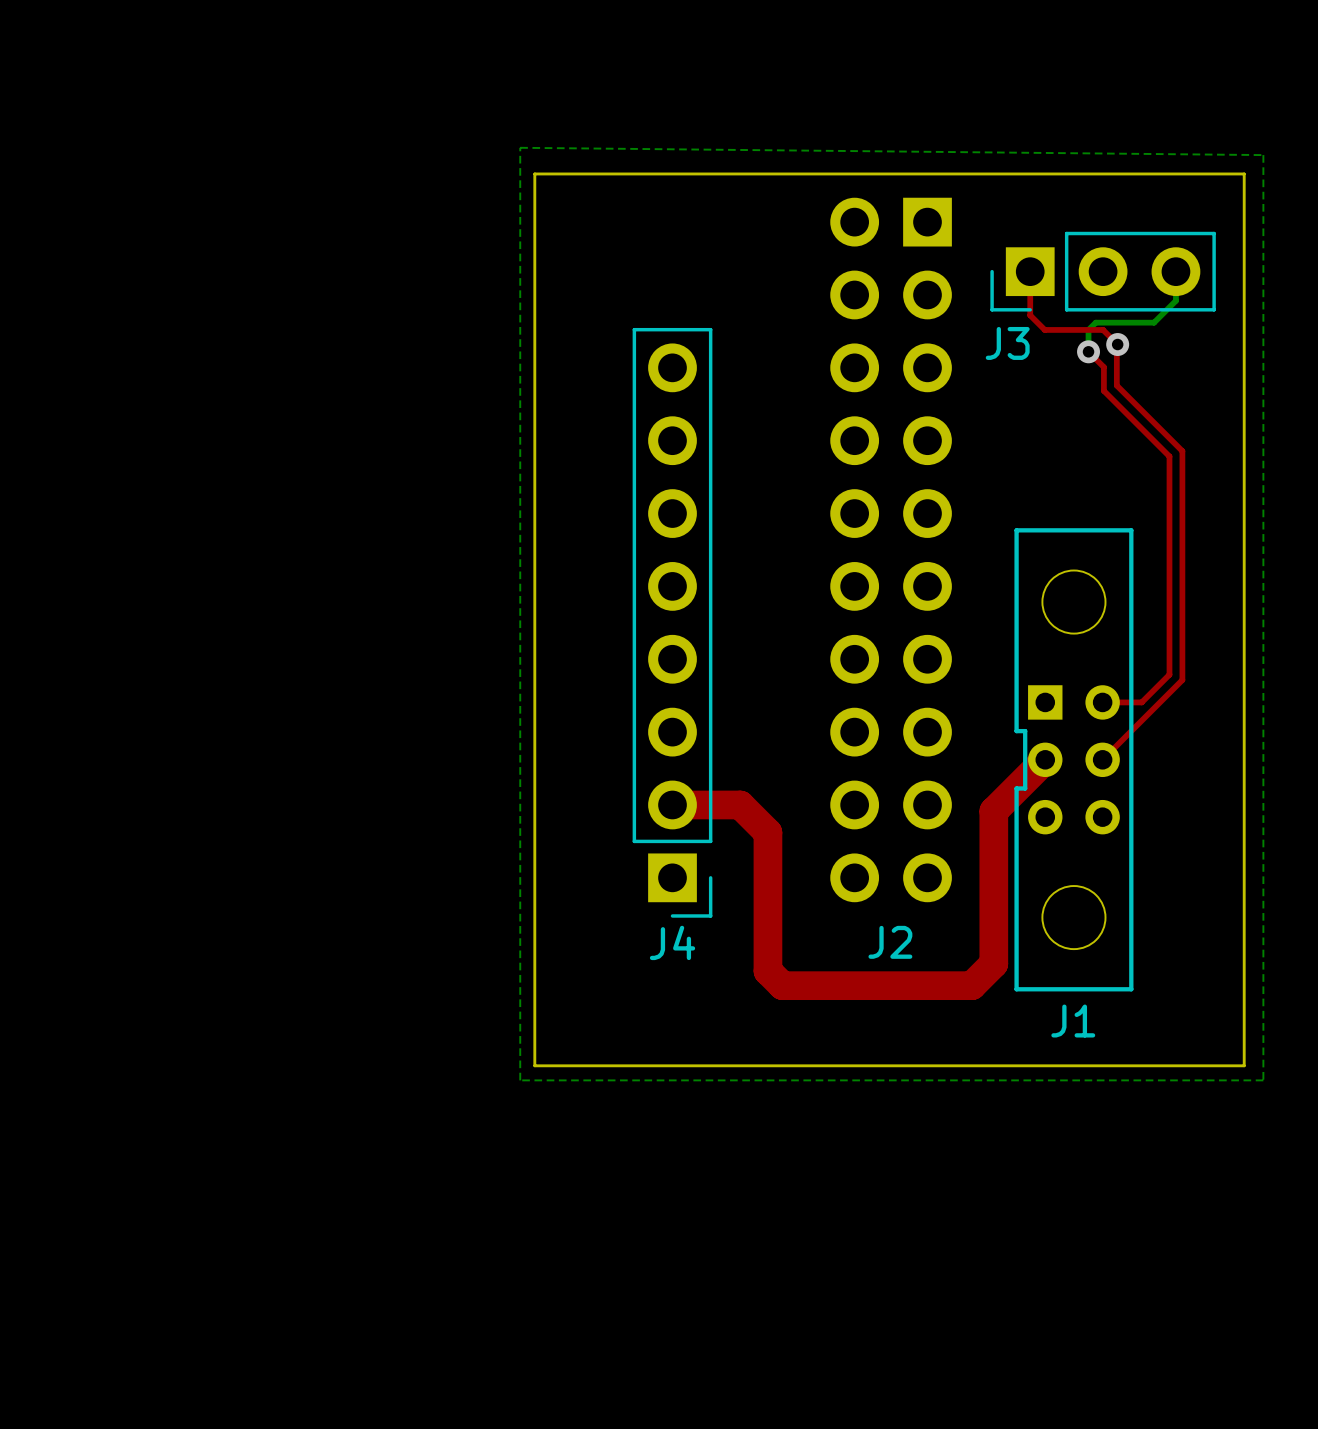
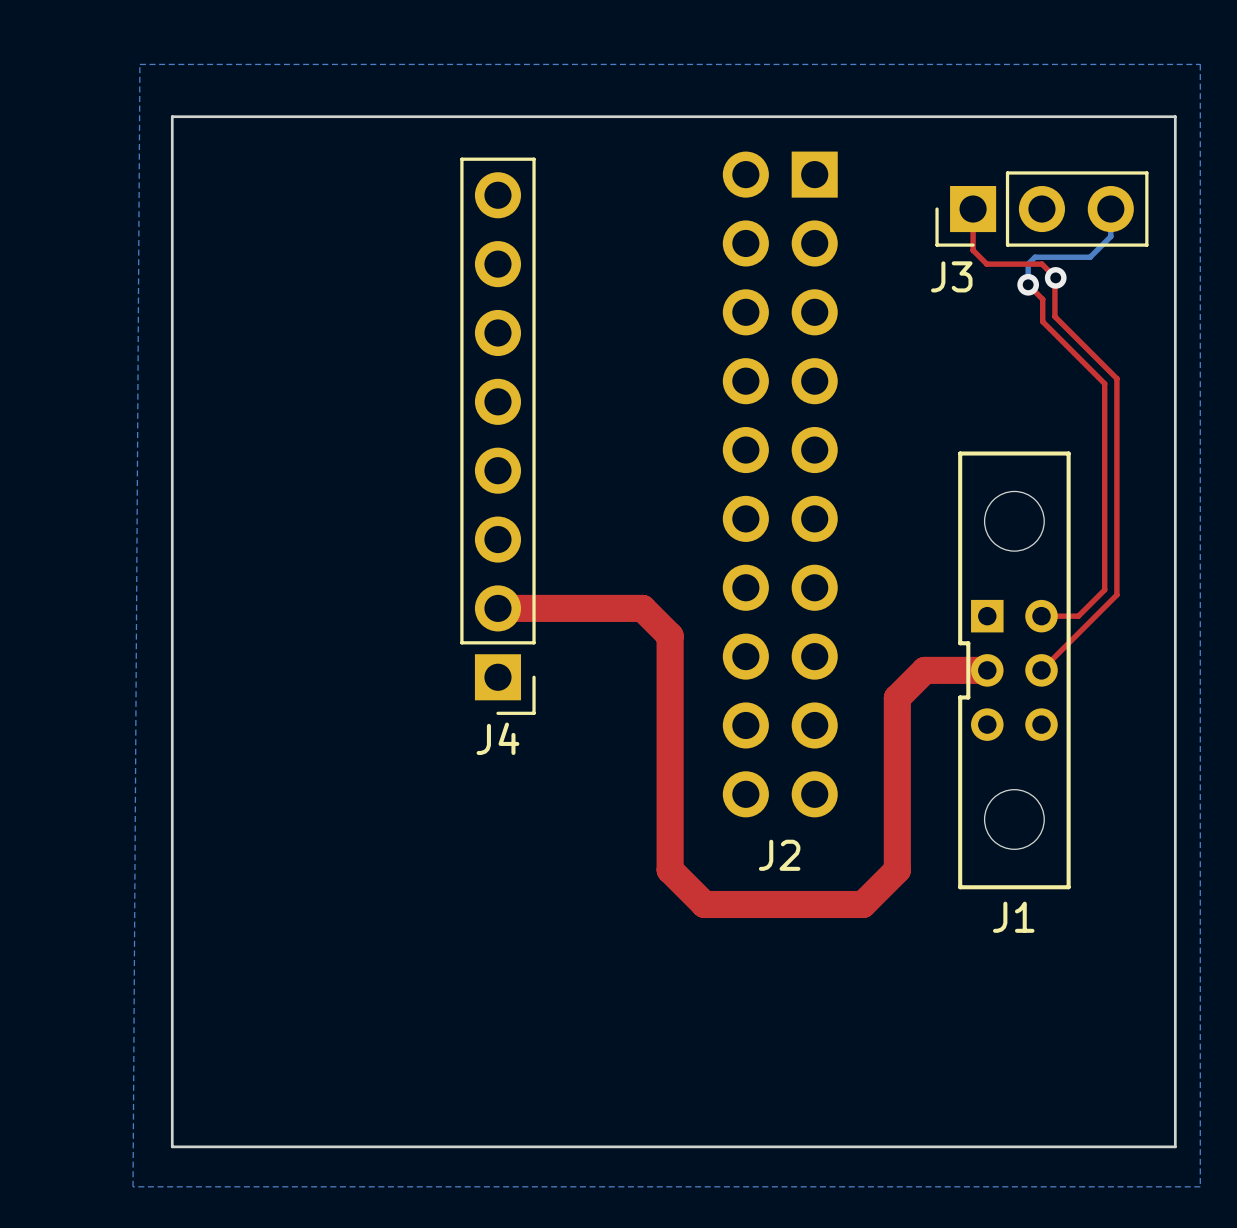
bottom zone outline: (520, 147) (520, 1080) (1263, 1080) (1263, 155) (520, 147) -> (139, 64) (133, 1186) (1200, 1186) (1200, 64) (139, 64)
board edge: (534, 173) (534, 1065) (1244, 1065) -> (504, 116) (172, 116) (172, 1146) (1175, 1146) (1175, 959)
J2 position: (891, 549) -> (780, 484)
J4 position: (672, 622) -> (497, 436)
top track: (1045, 759) (993, 811) (993, 963) (971, 985) (782, 985) (767, 971) (767, 832) (740, 804) (672, 804) -> (987, 670) (924, 670) (897, 697) (897, 870) (862, 904) (704, 904) (670, 870) (670, 635) (642, 608) (497, 608)

